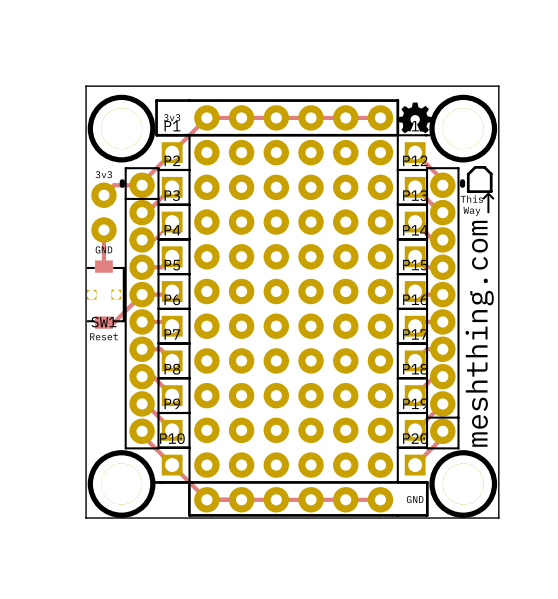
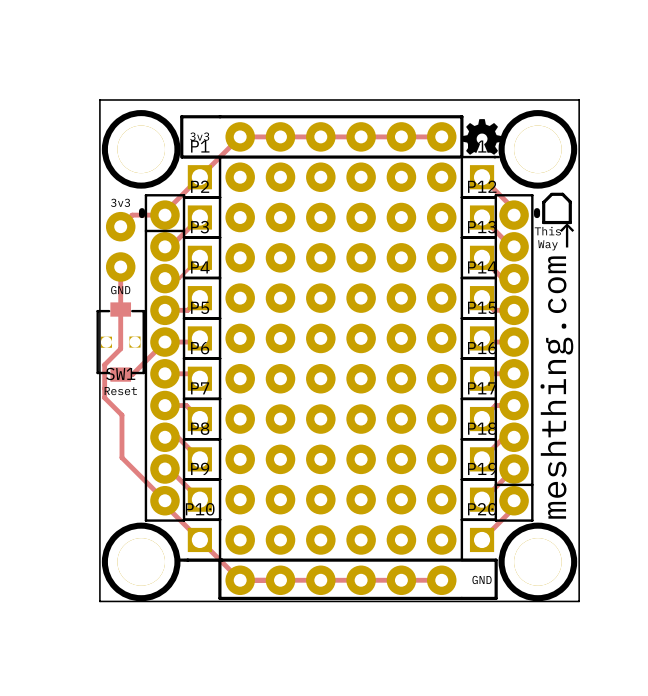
SW1 footprint: [86, 260, 125, 329] -> [96, 302, 145, 382]
track: none -> (120, 309) (120, 348) (104, 364) (104, 397) (121, 415) (121, 457) (164, 500)

